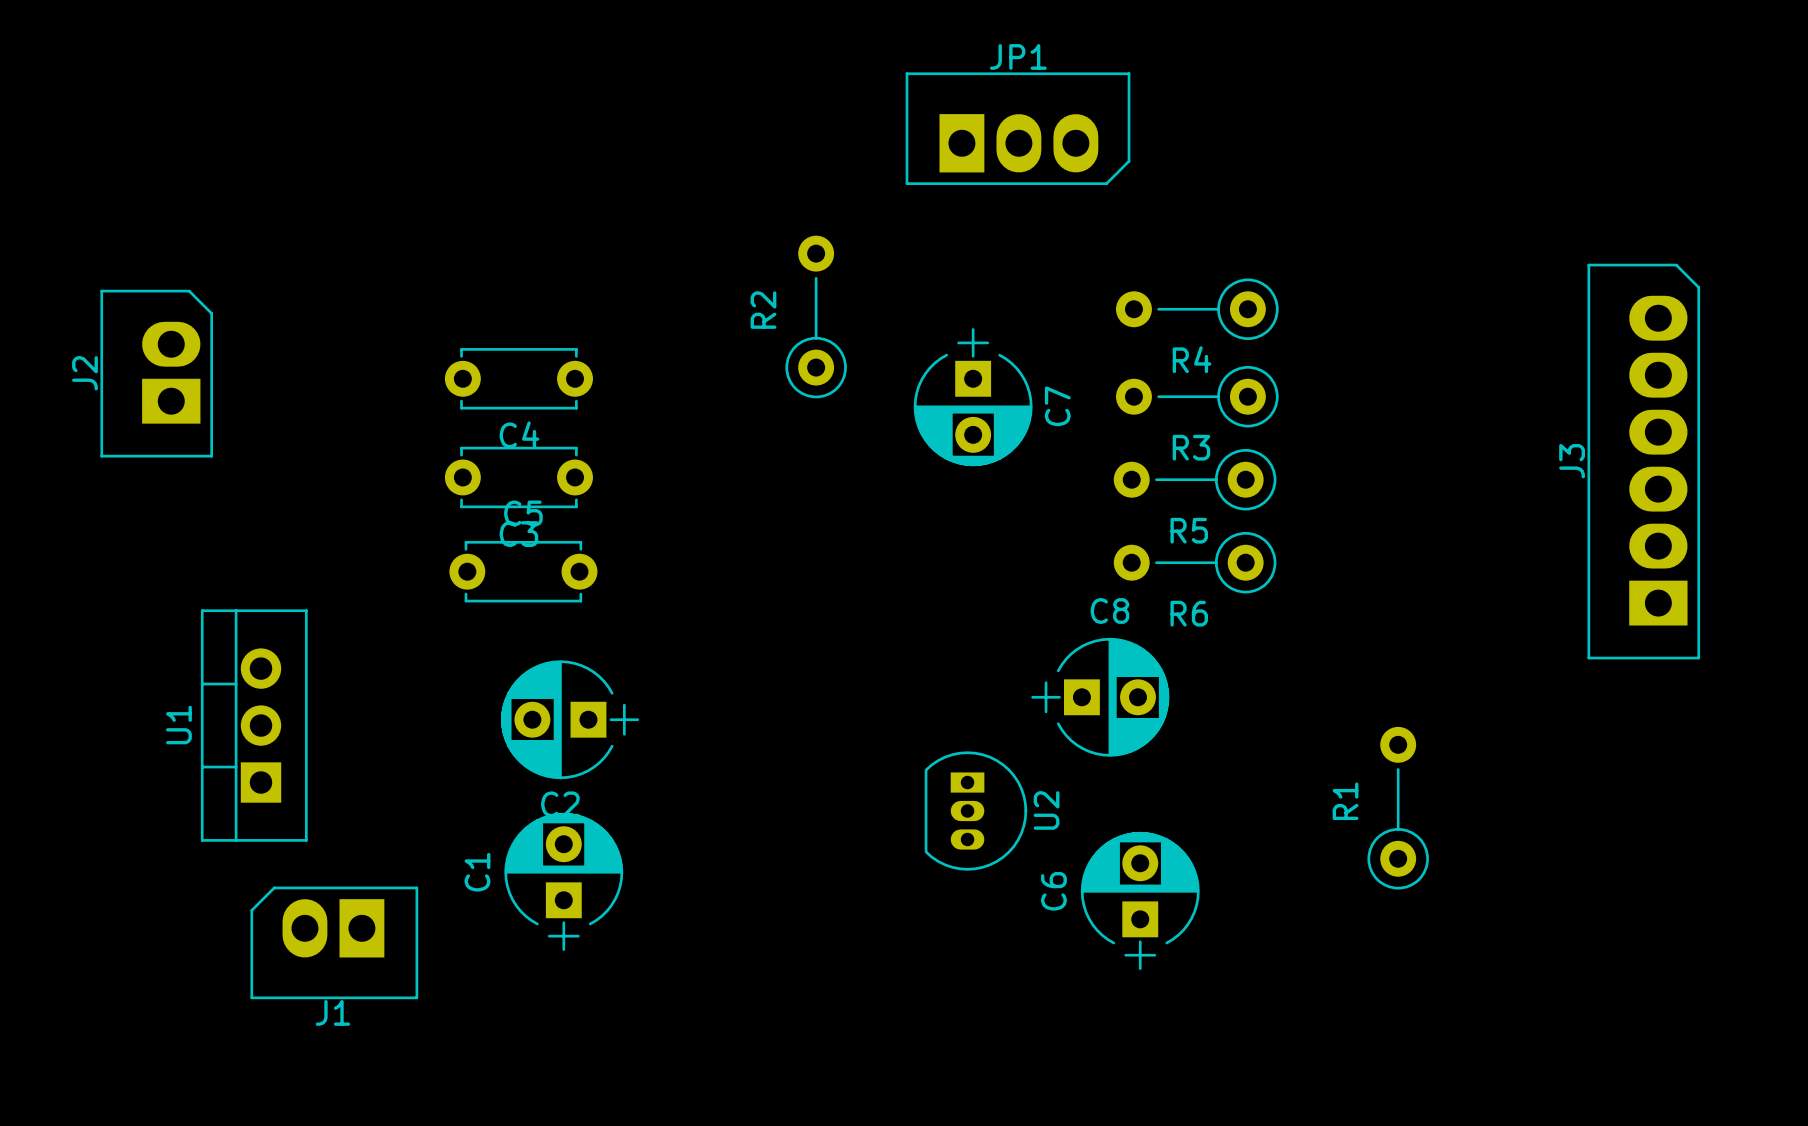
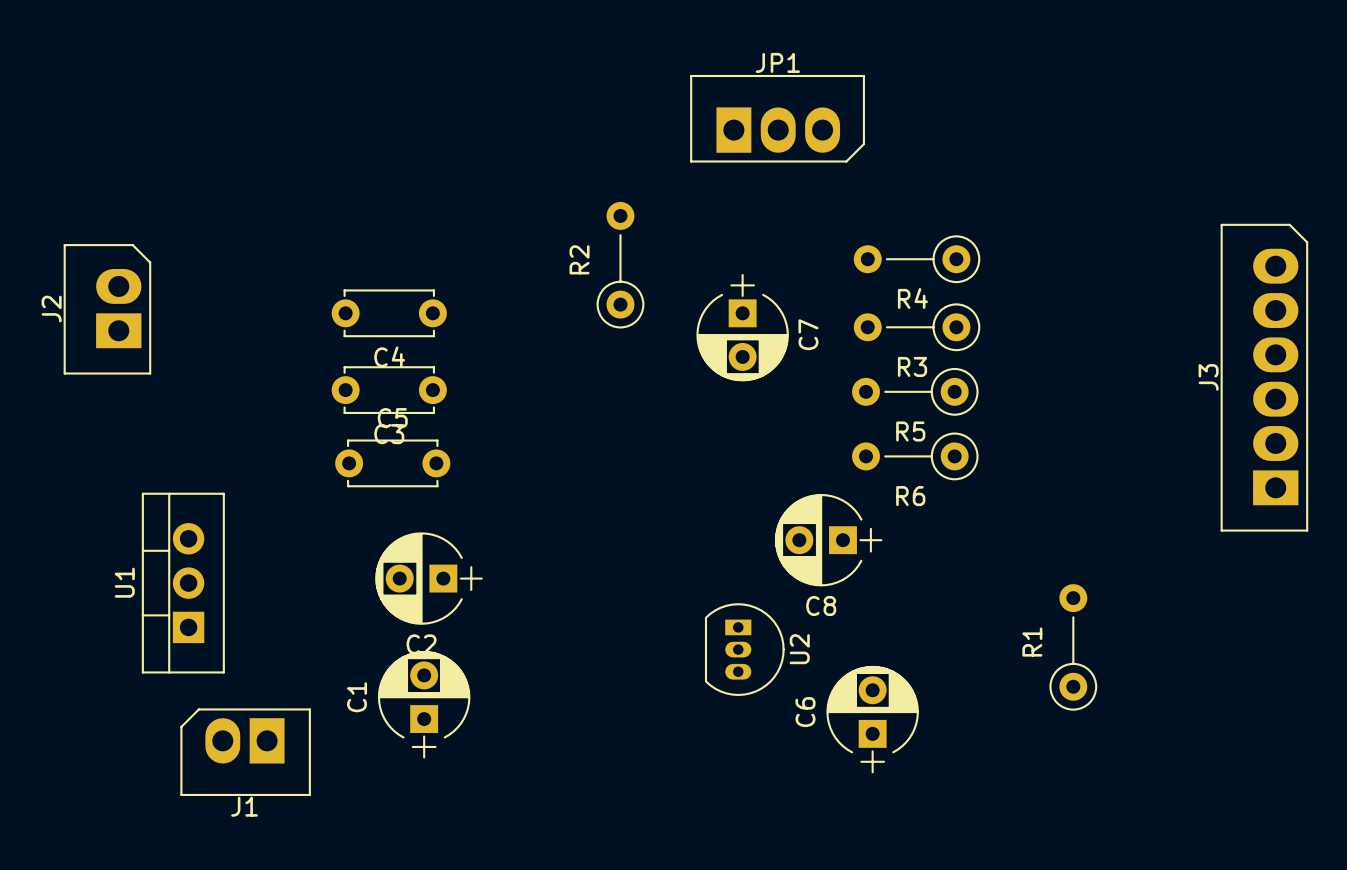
C8 rotation: 0° (1100, 697) -> 180° (828, 540)

